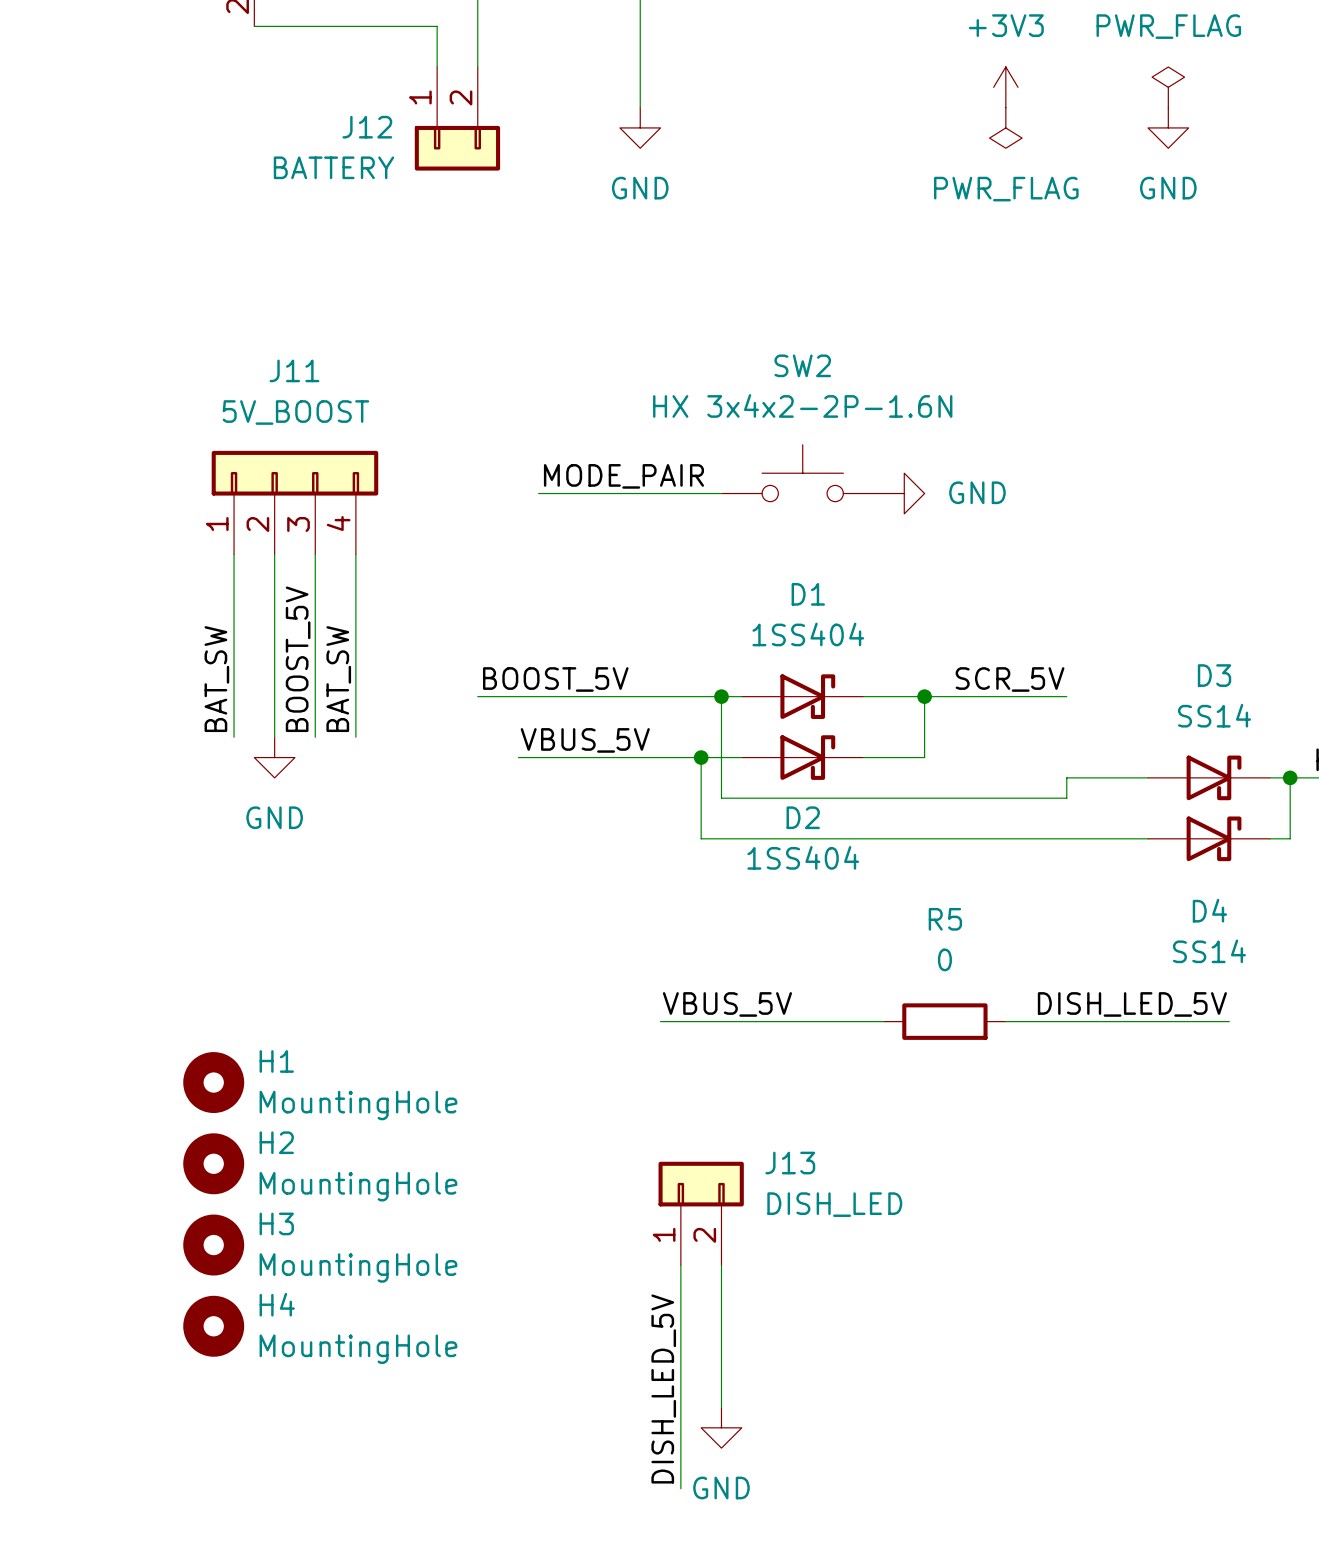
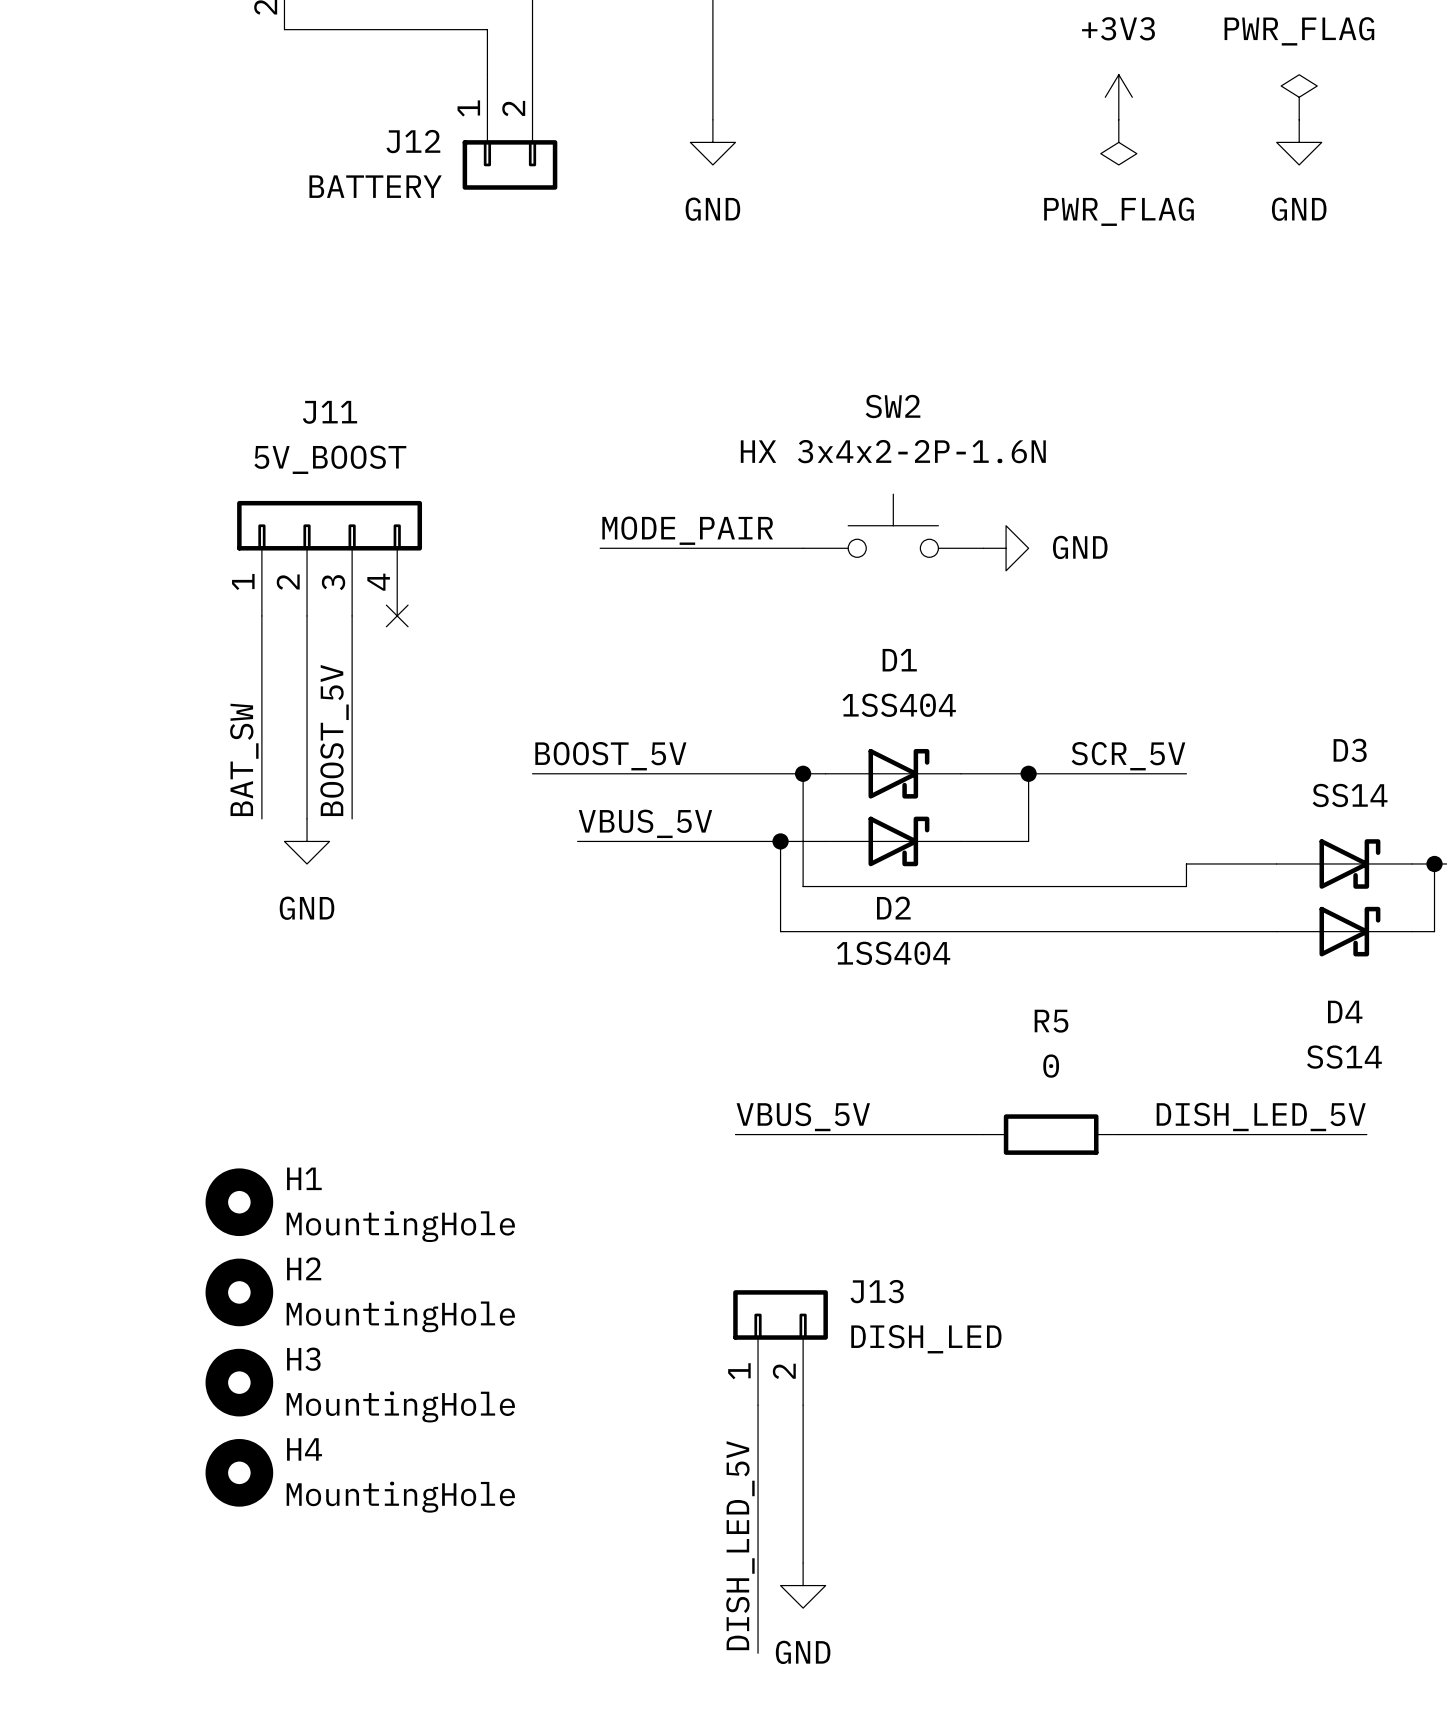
wire: (355, 554) (355, 737) -> none
no-connect mark: none -> (397, 615)
label: BAT_SW (338, 679) -> none

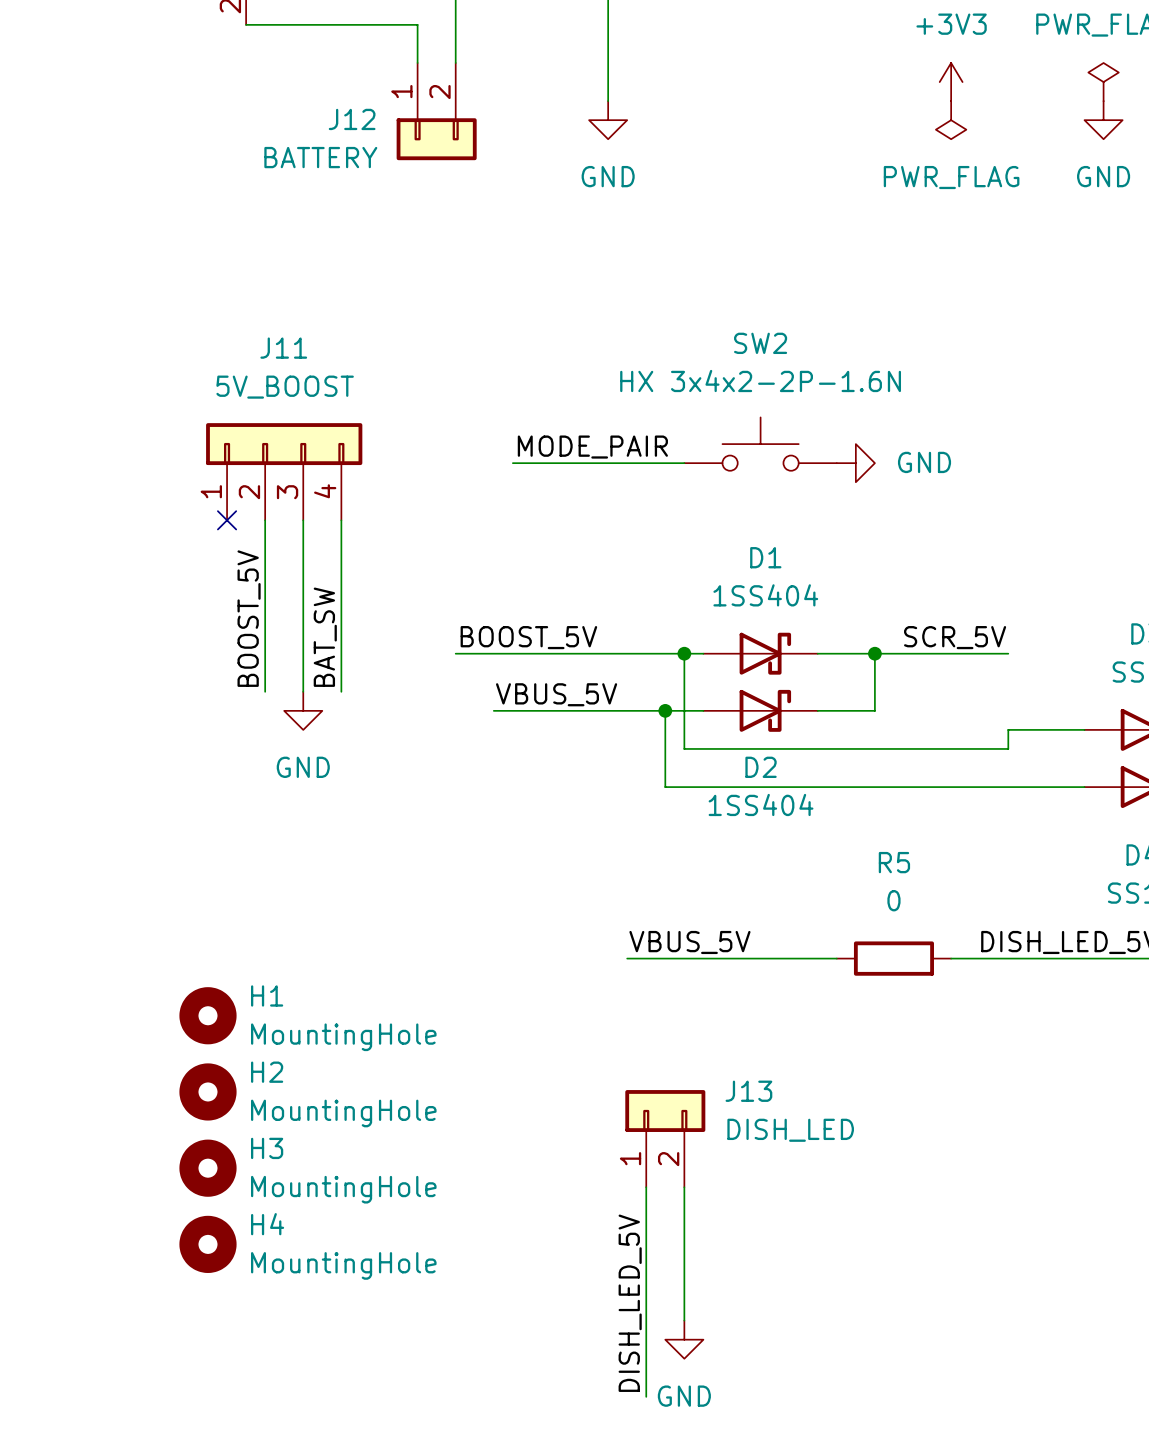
wire: (261, 615) (261, 818) -> (341, 520) (341, 691)
no-connect mark: none -> (227, 520)
no-connect mark: (397, 615) -> none
label position: BOOST_5V (334, 740) -> BOOST_5V (249, 618)
label position: BAT_SW (244, 759) -> BAT_SW (325, 637)
power symbol position: GND (307, 841) -> GND (303, 710)

